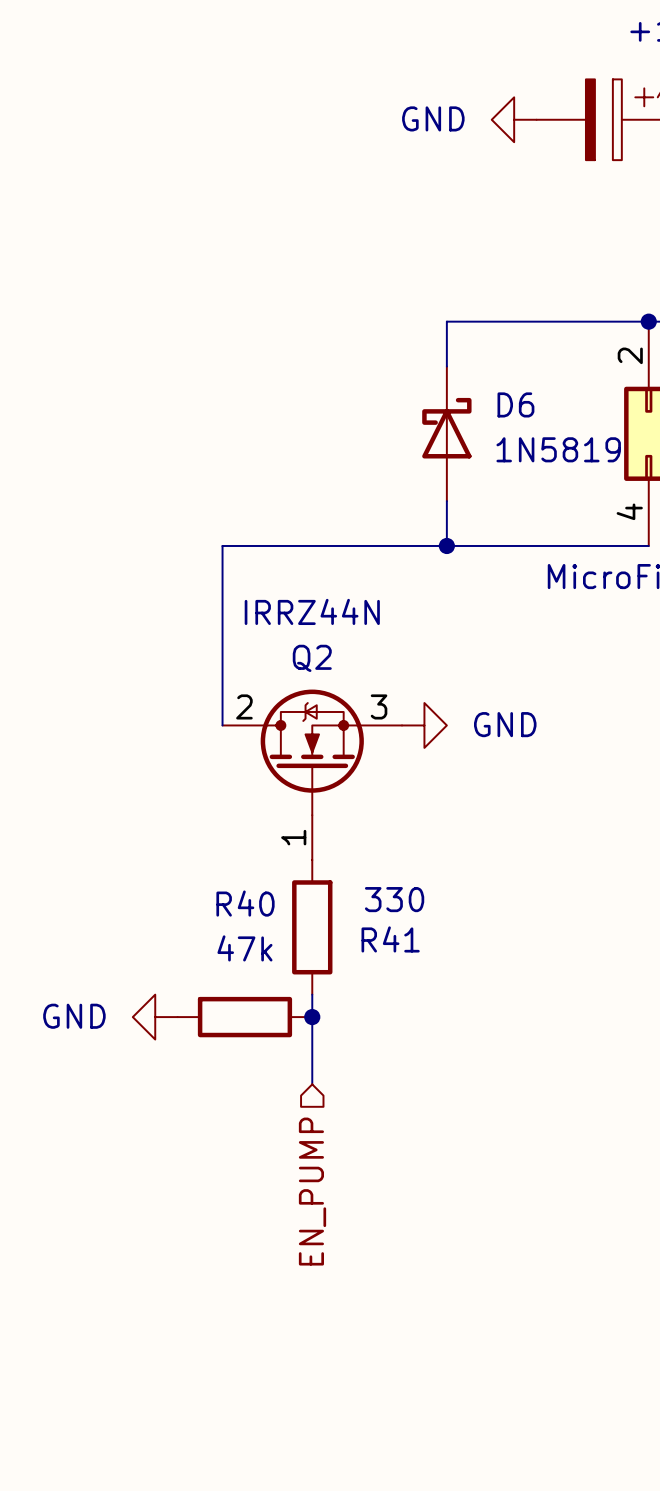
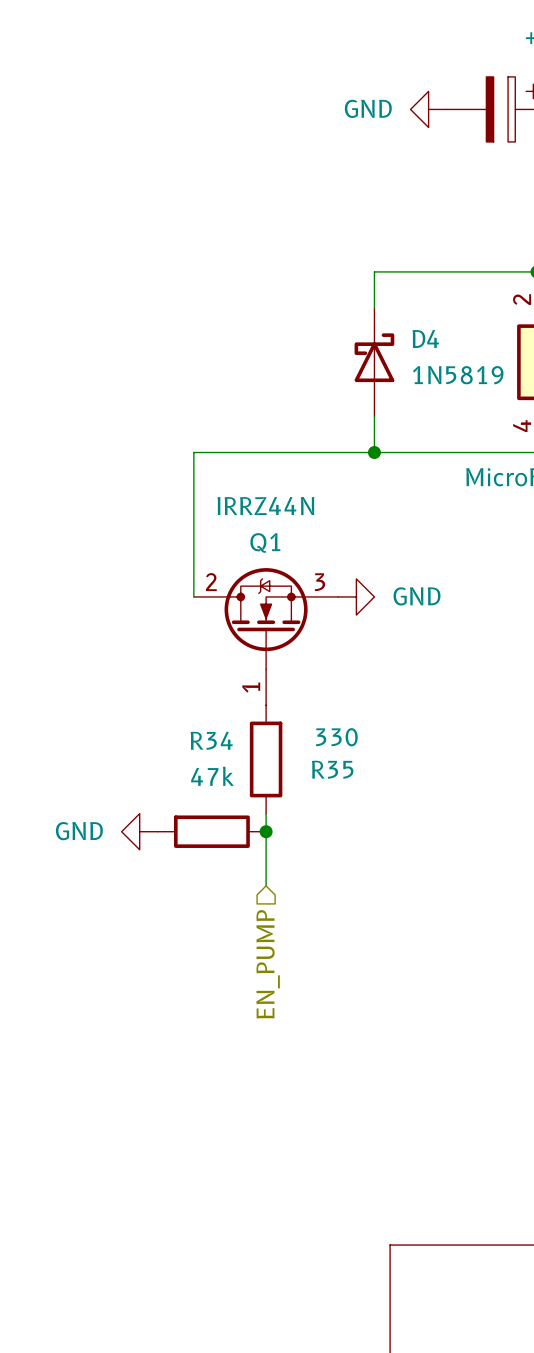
D6 name: D6 (515, 404) -> D4 (425, 338)
Q2 name: Q2 (312, 658) -> Q1 (265, 542)
R40 name: R40 (245, 903) -> R34 (211, 740)
R41 name: R41 (390, 939) -> R35 (332, 769)

